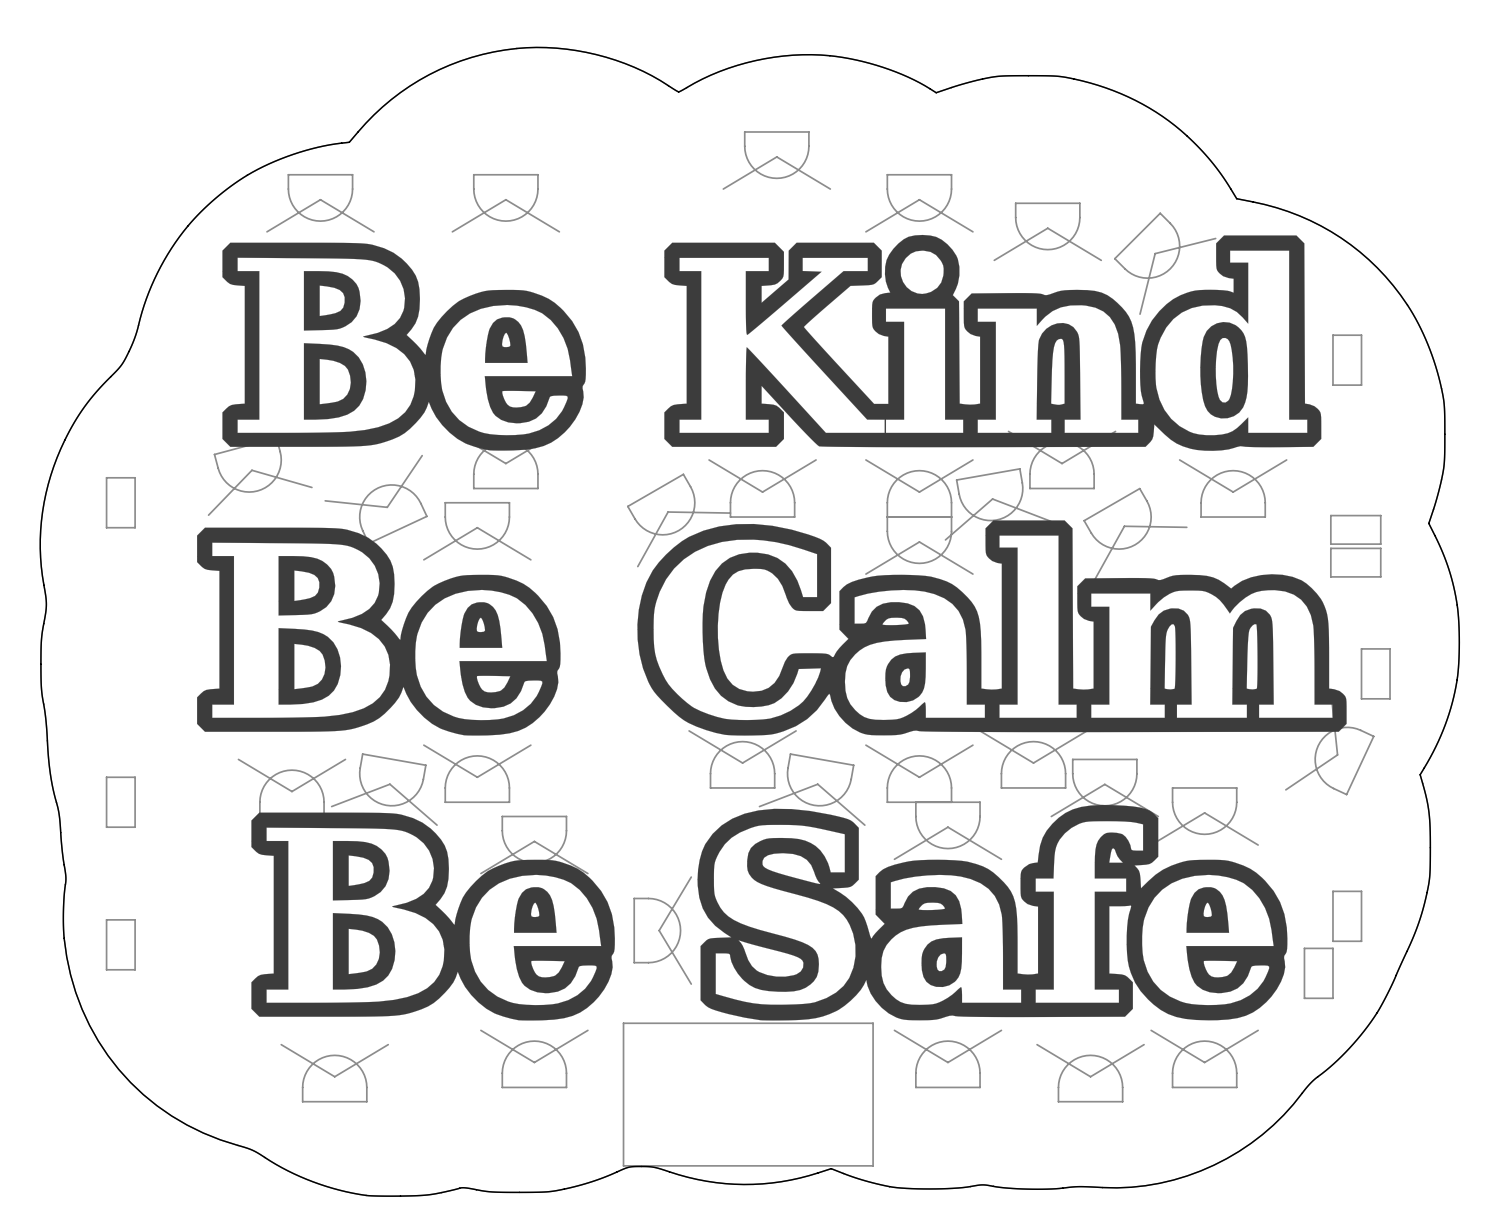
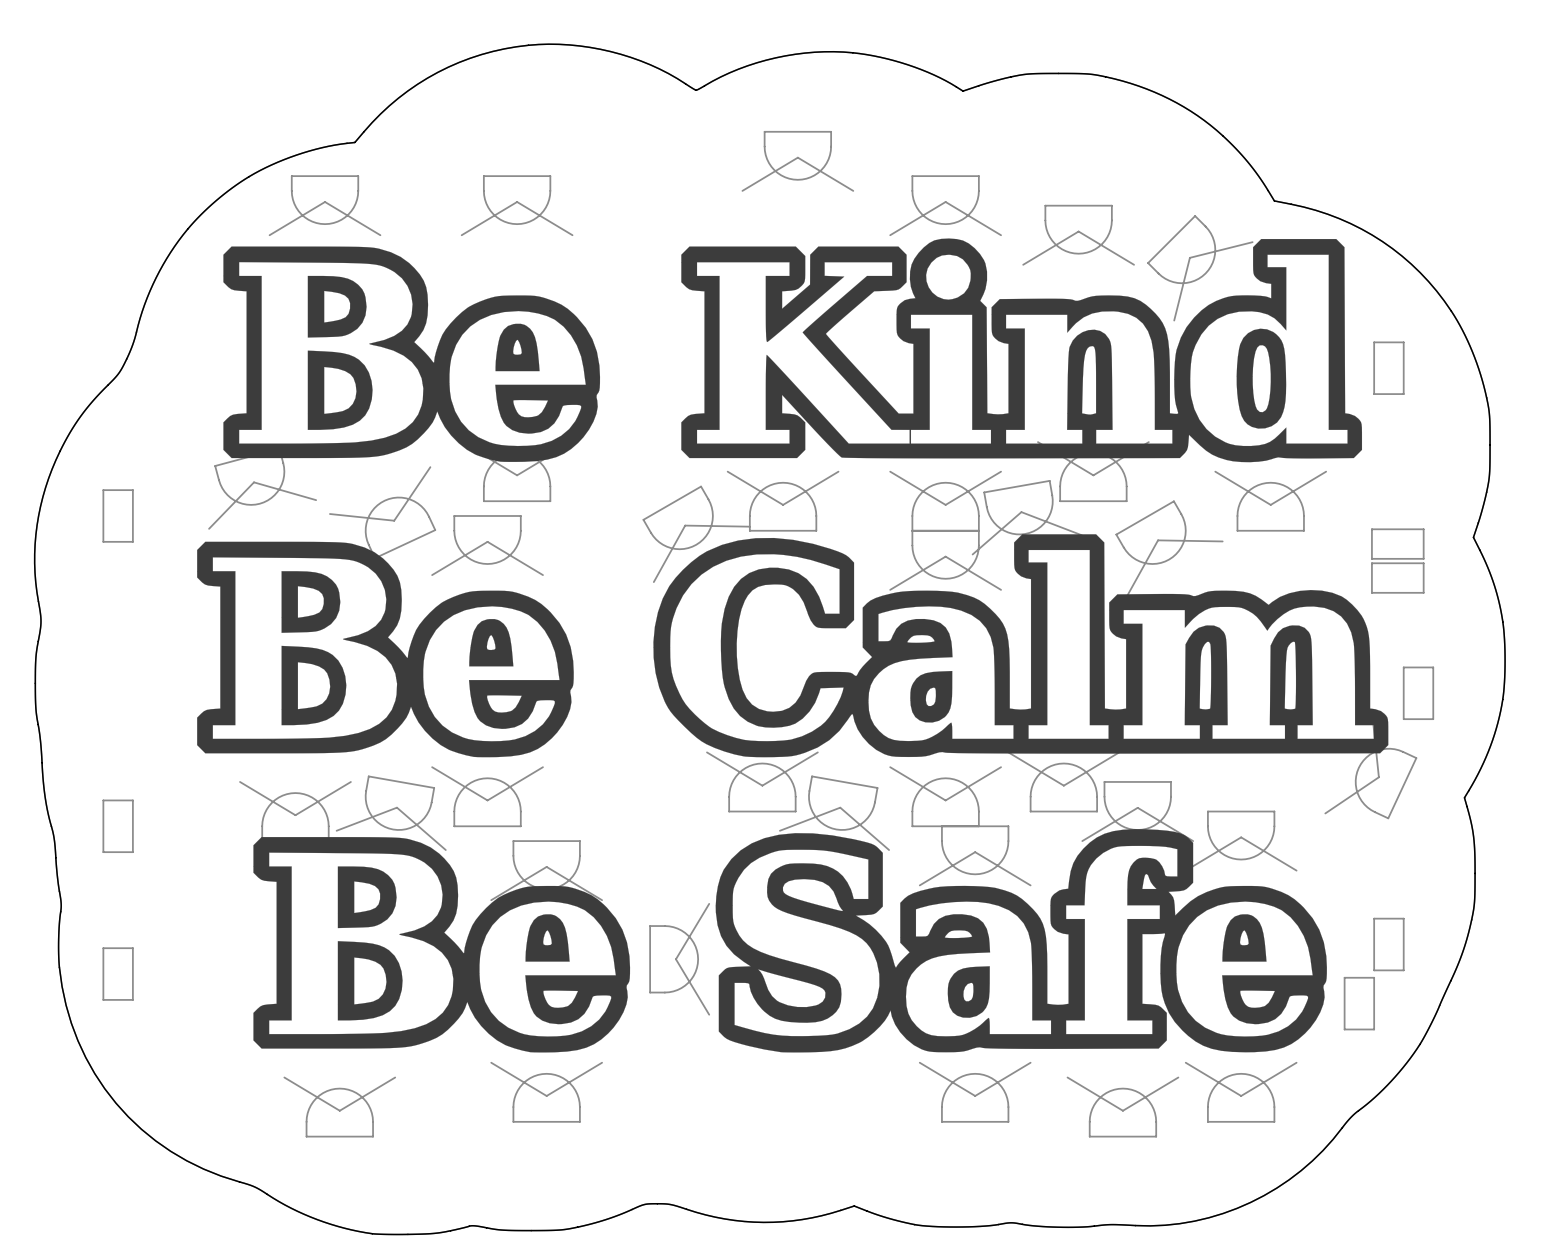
part: (748, 1094) -> none

